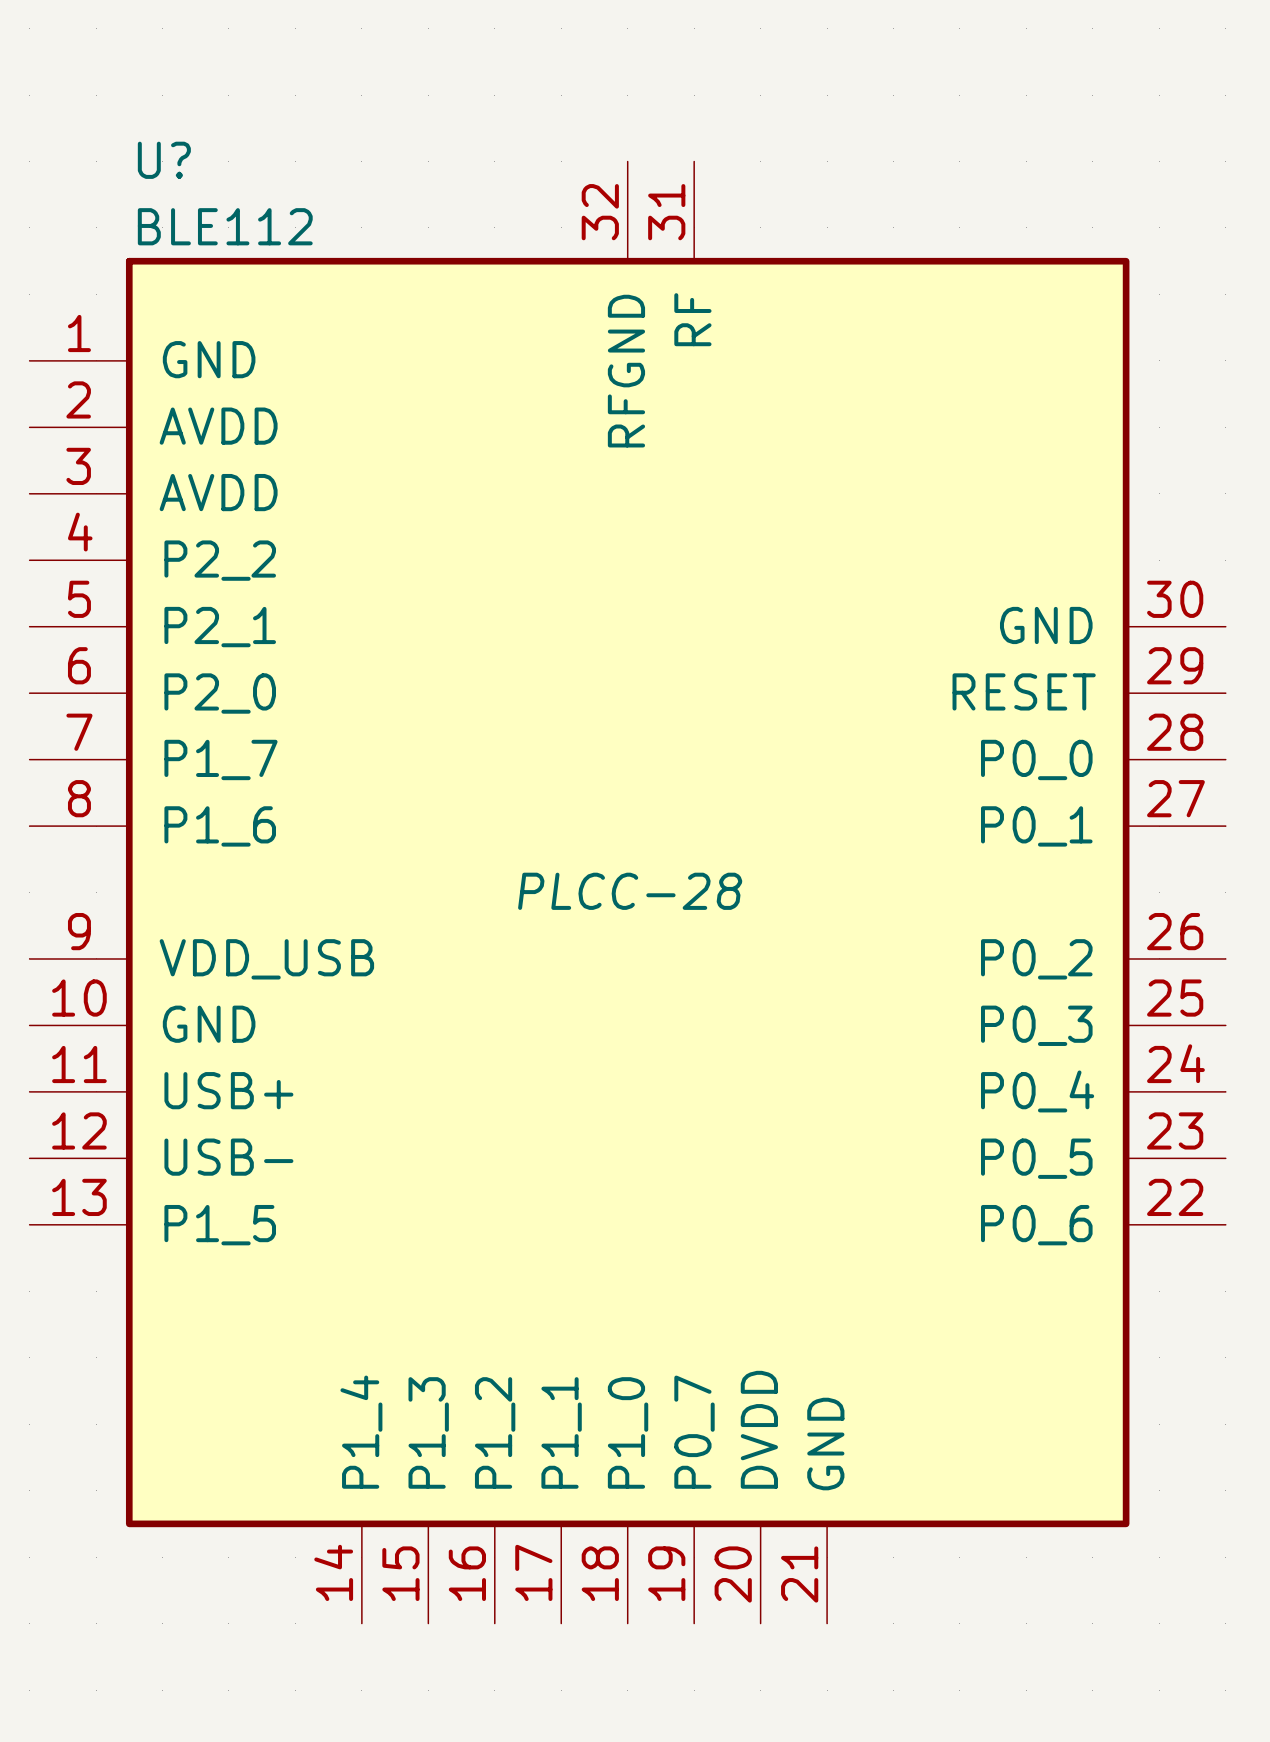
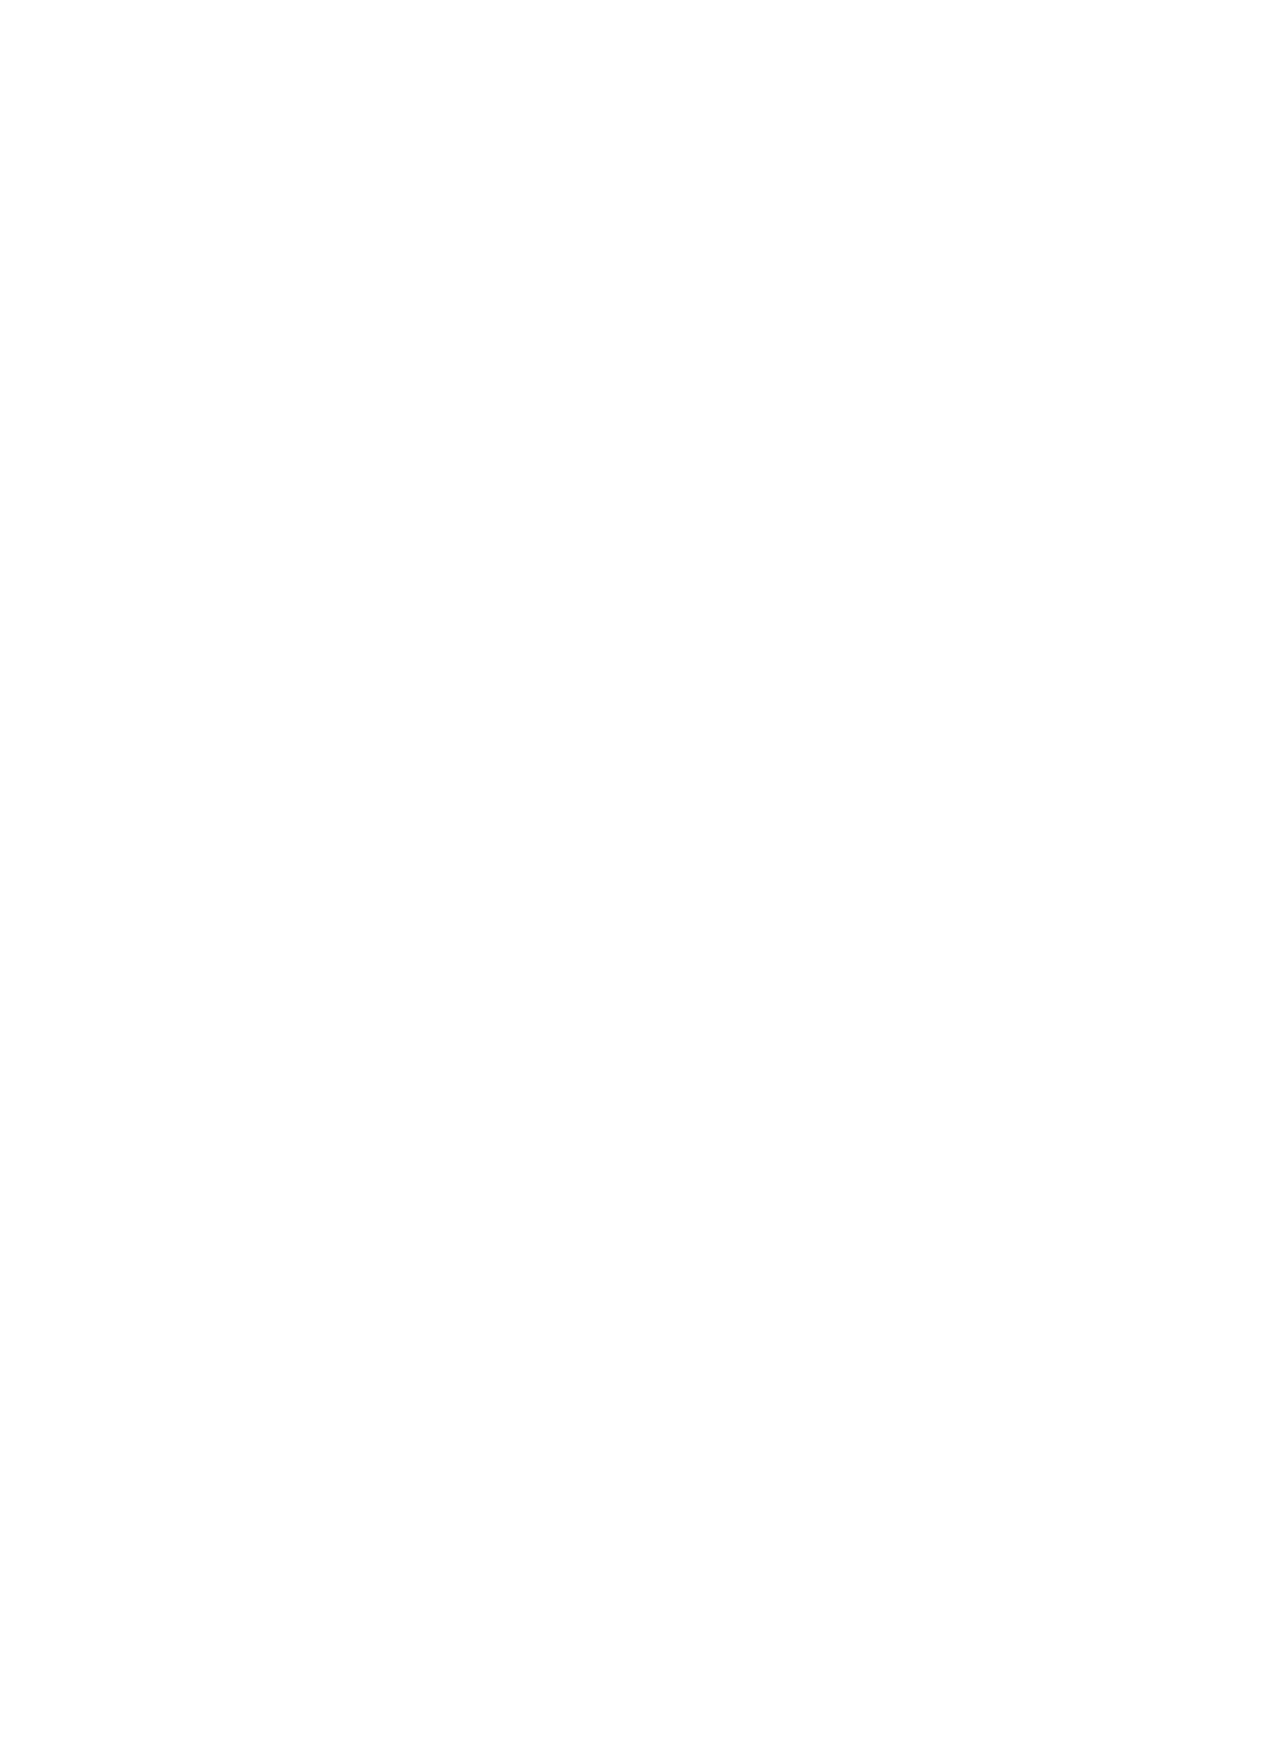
U?: BLE112 (627, 892) -> none

